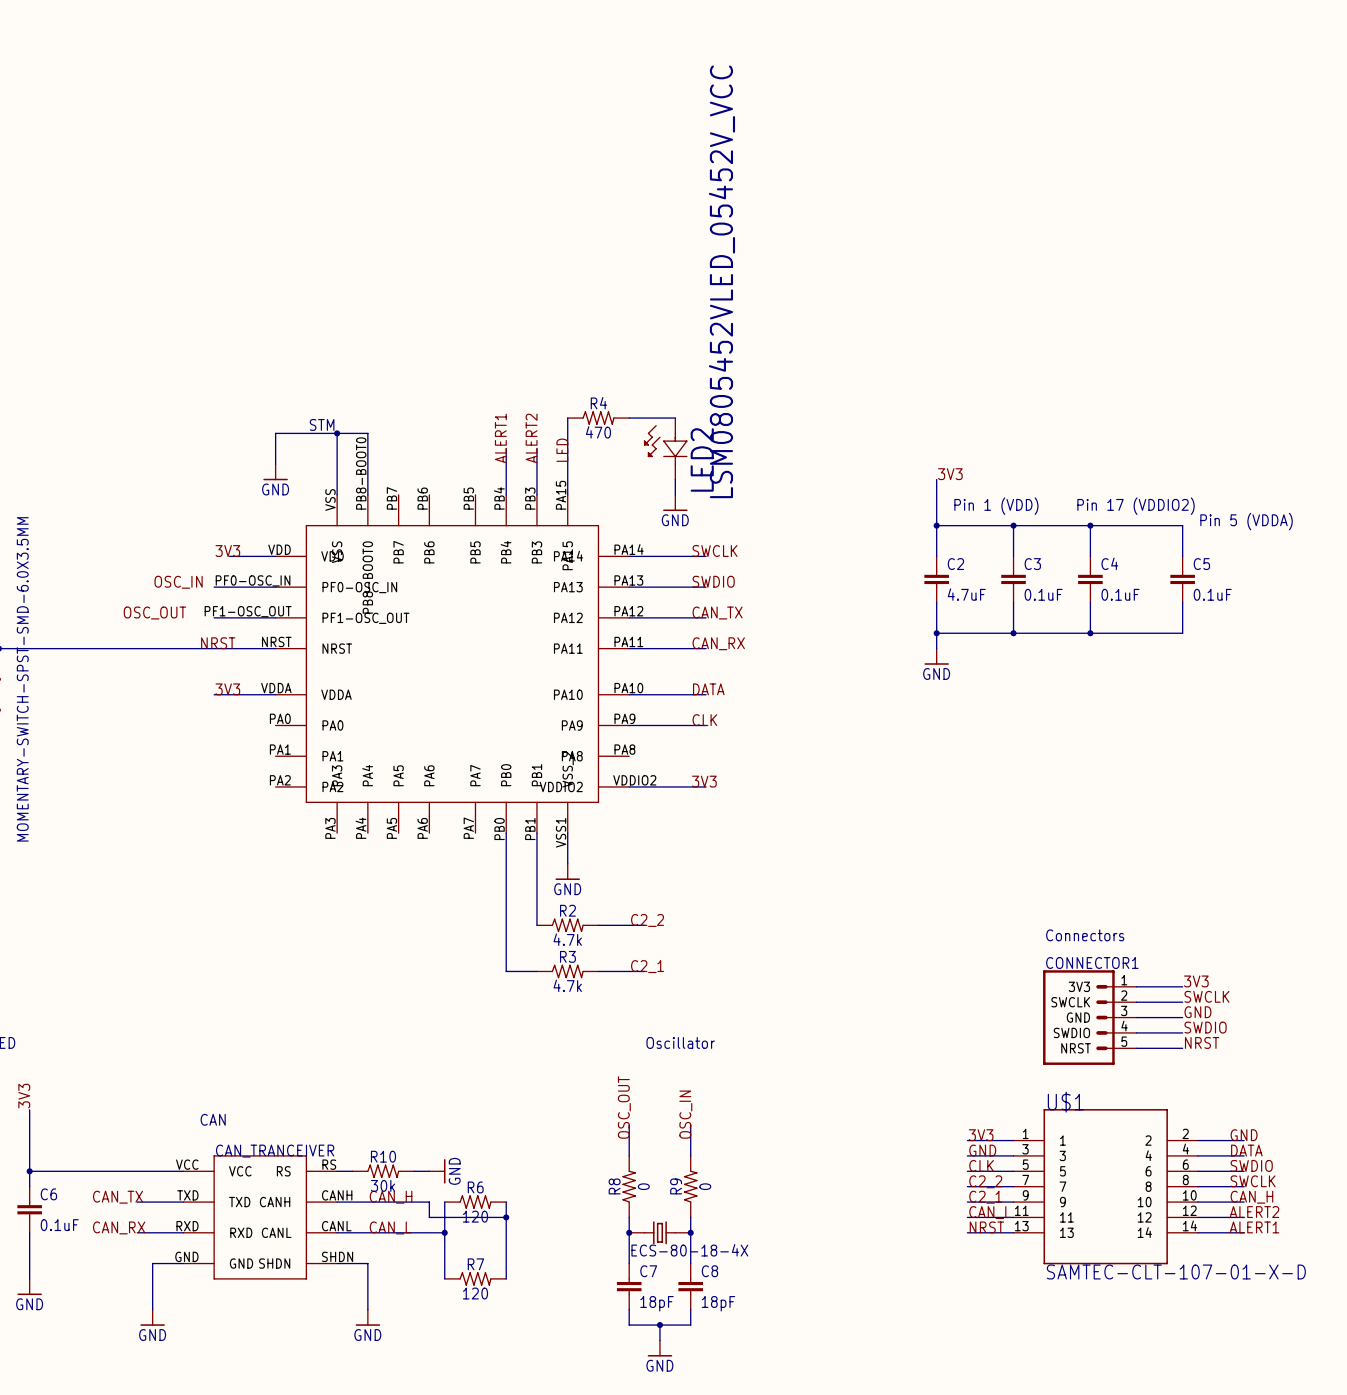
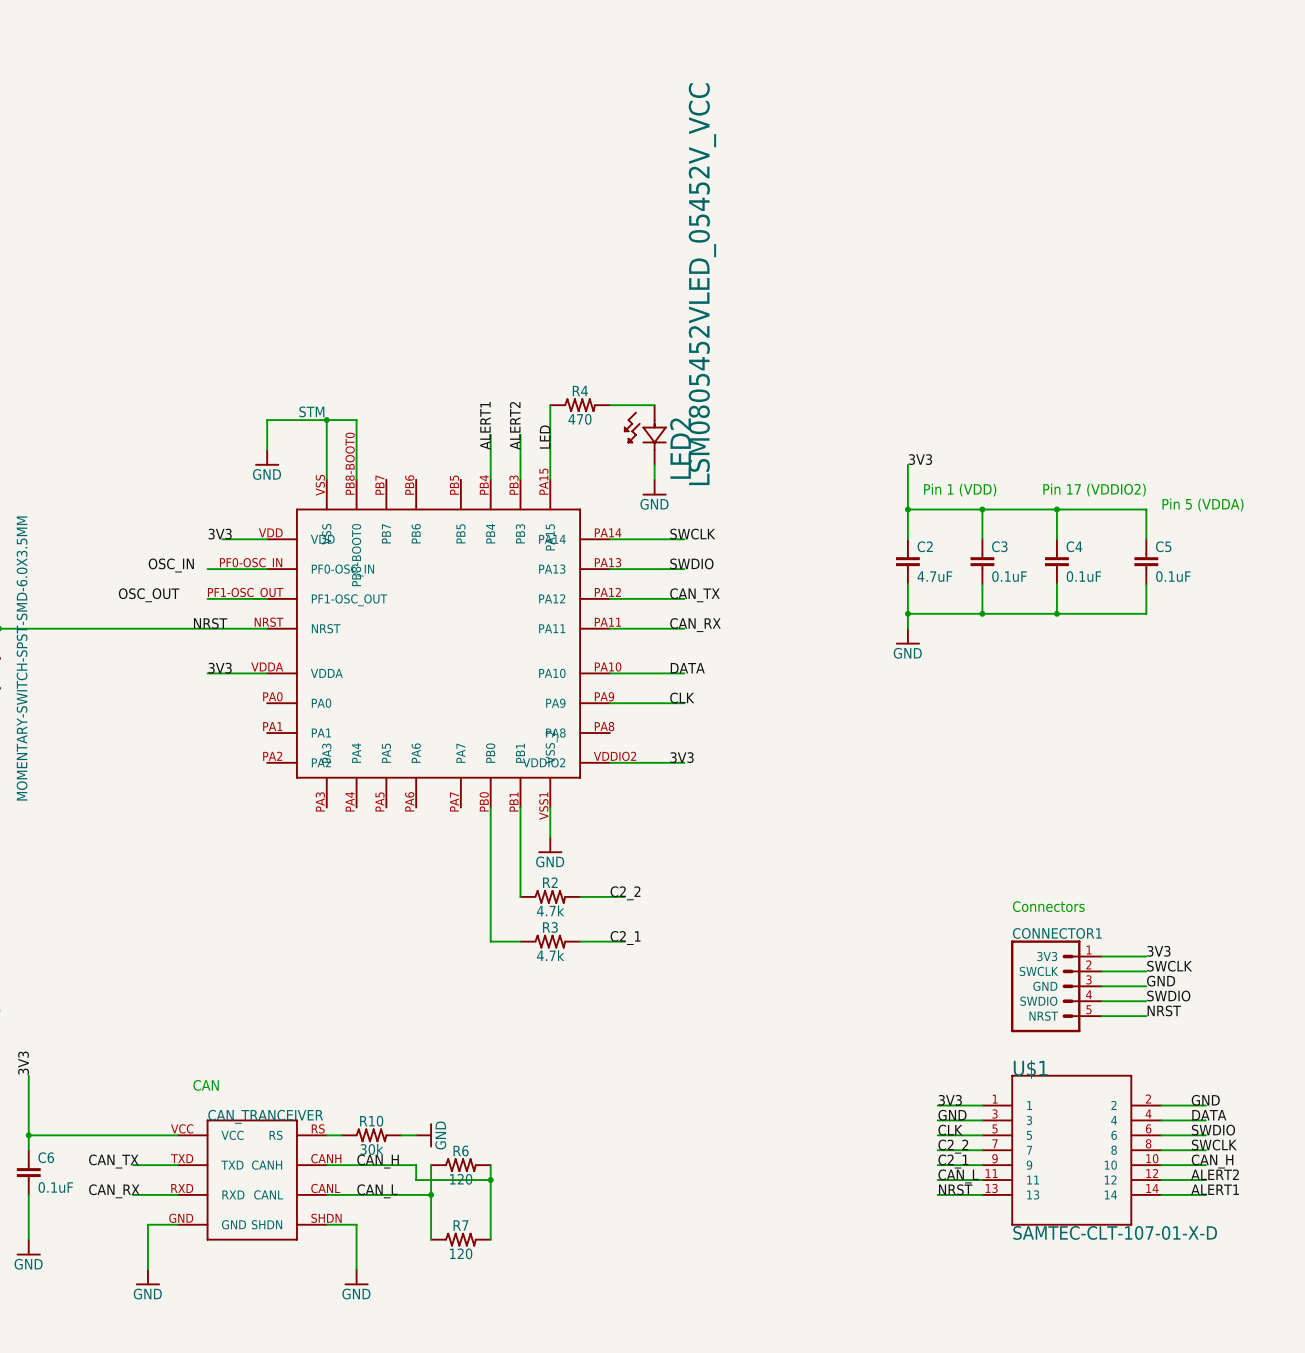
text: Oscillator (680, 1042) -> none
label: OSC_OUT (624, 1107) -> none
label: OSC_IN (685, 1114) -> none
wire: (629, 1125) (629, 1155) -> none
wire: (690, 1125) (690, 1155) -> none
R8: 0 (629, 1186) -> none
R9: 0 (690, 1186) -> none
wire: (629, 1217) (629, 1263) -> none
wire: (690, 1217) (690, 1263) -> none
junction: (629, 1232) -> none
part: ECS-80-18-4X (659, 1232) -> none
junction: (690, 1232) -> none
C7: 18pF (629, 1286) -> none
C8: 18pF (690, 1286) -> none
wire: (629, 1309) (629, 1325) (690, 1325) (690, 1309) -> none
wire: (659, 1325) (659, 1340) -> none
junction: (659, 1325) -> none
power symbol: GND (659, 1348) -> none

